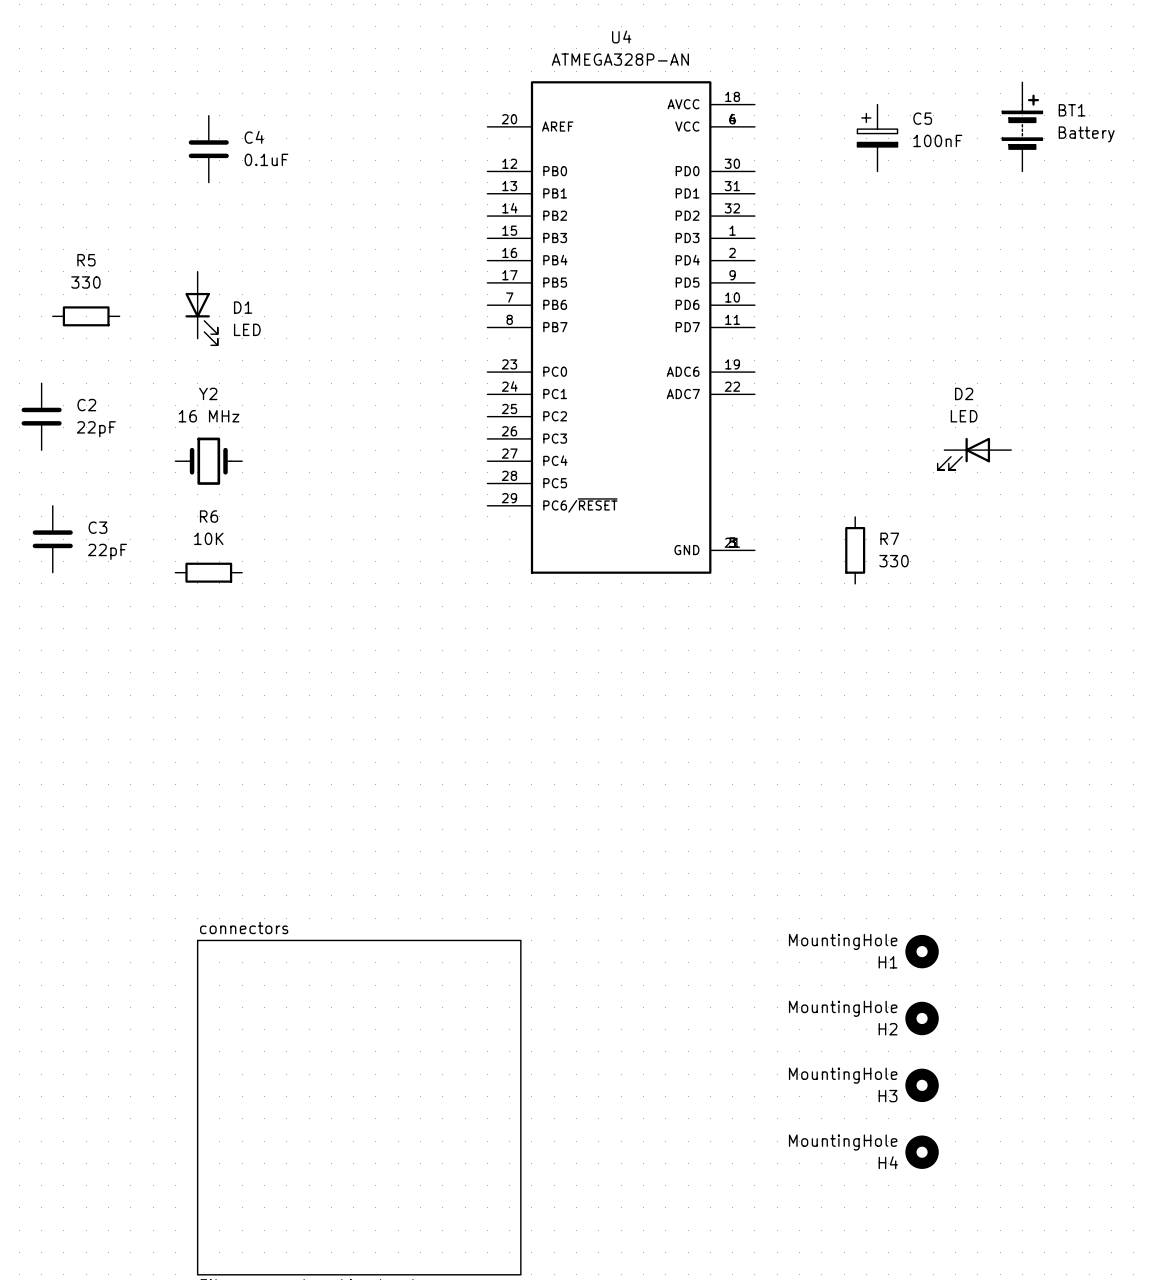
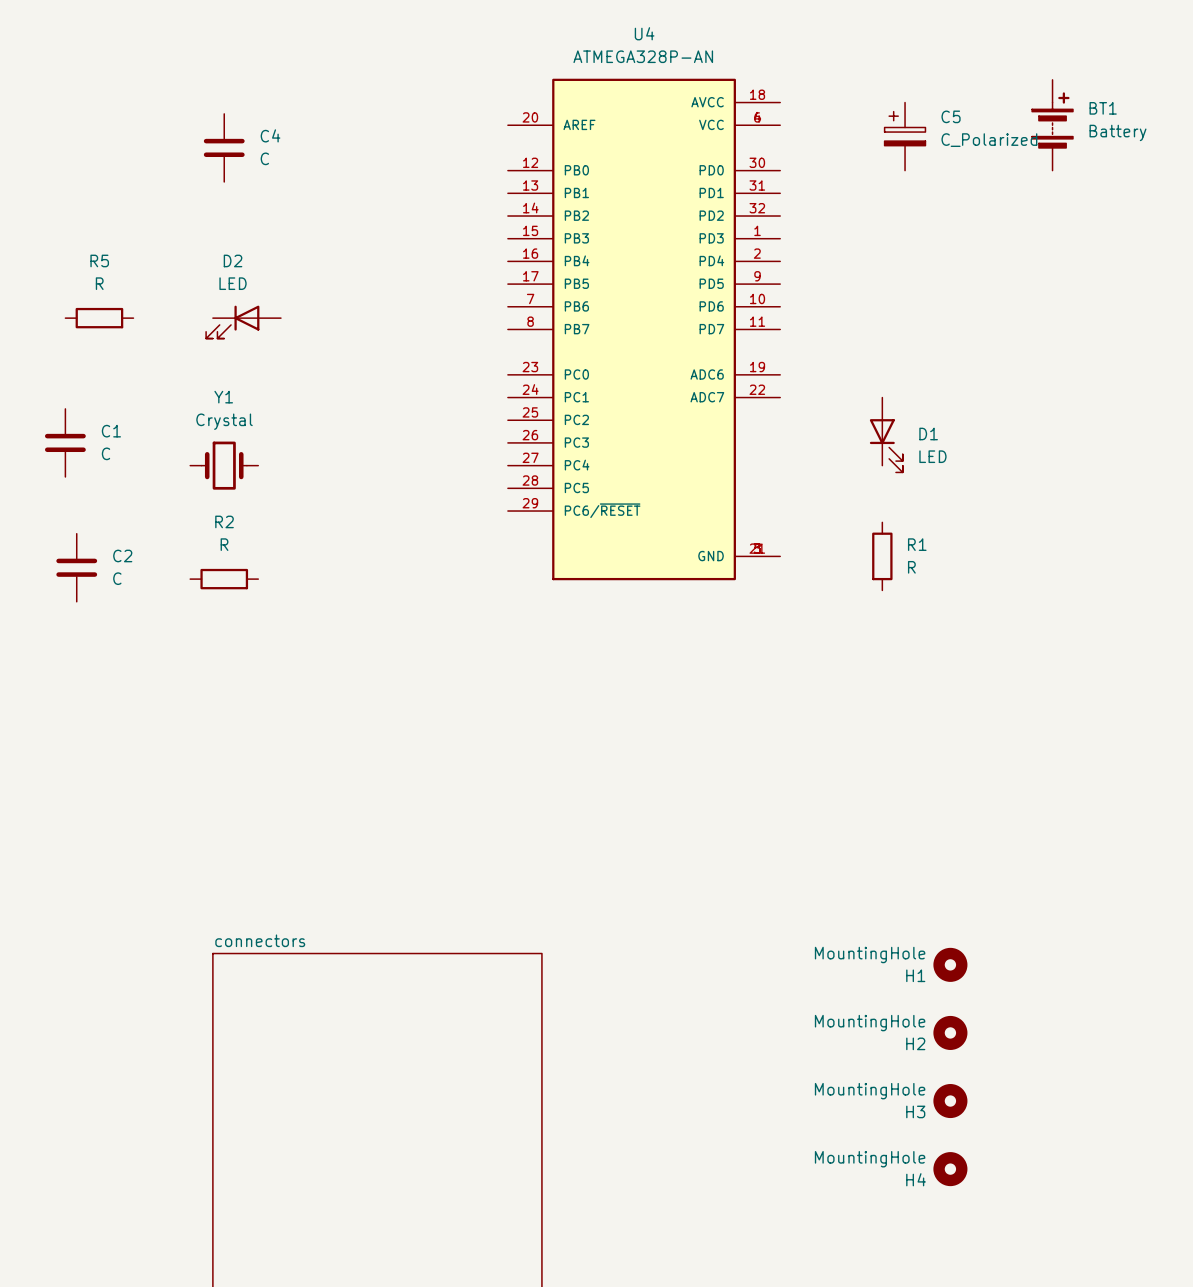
C5 value: 100nF (937, 140) -> C_Polarized (989, 140)
C4 value: 0.1uF (266, 159) -> C (264, 158)
R5 value: 330 (85, 282) -> R (99, 283)
D1 position: (201, 308) -> (886, 434)
Y2 name: Y2 (208, 393) -> Y1 (223, 397)
C2 position: (41, 416) -> (76, 567)
Y2 value: 16 MHz (209, 416) -> Crystal (224, 421)
C2 value: 22pF (96, 429) -> C (117, 578)
C1: none -> C (65, 442)
D2 position: (974, 453) -> (243, 322)
R6 name: R6 (209, 516) -> R2 (224, 521)
R6 value: 10K (208, 538) -> R (224, 544)
R7 name: R7 (889, 538) -> R1 (917, 544)
C3: 22pF (52, 539) -> none
R7 value: 330 (894, 561) -> R (911, 567)

